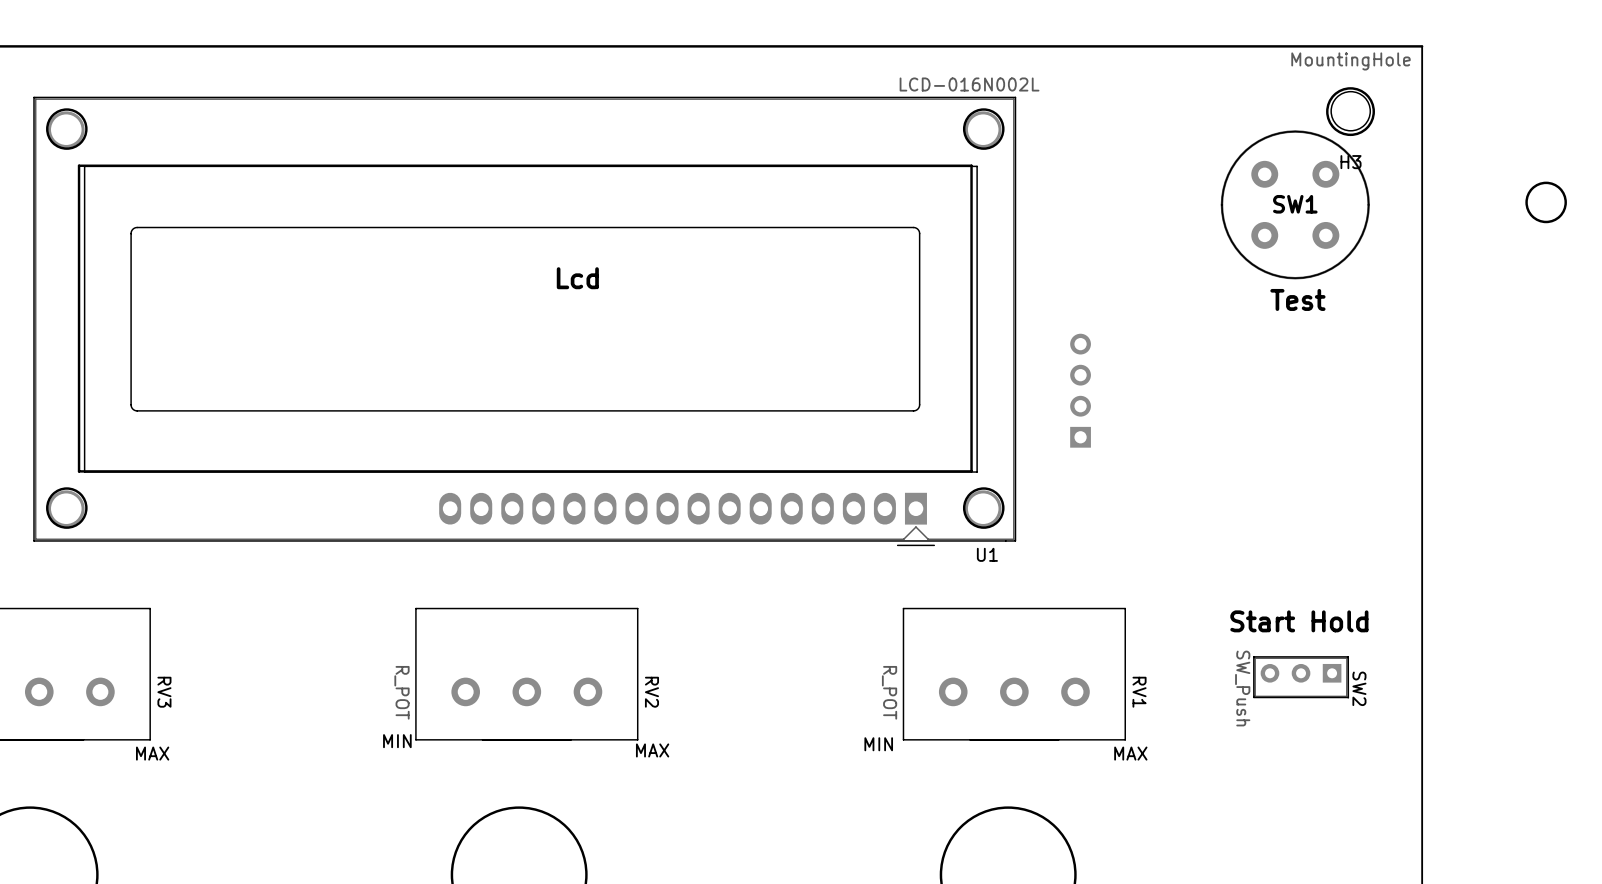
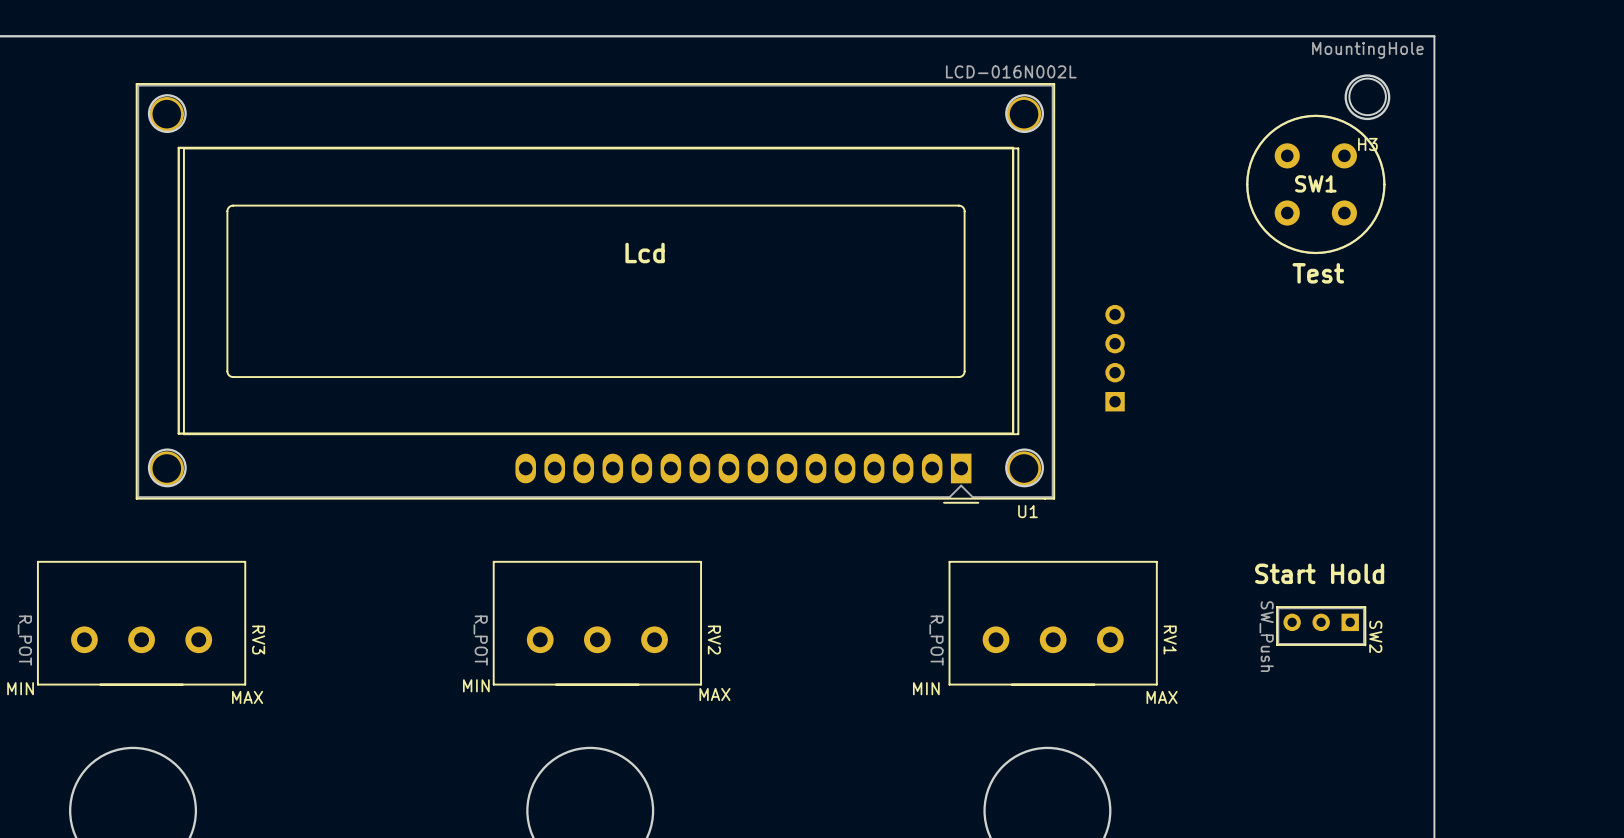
drawing: [1525, 181, 1567, 224] -> none

